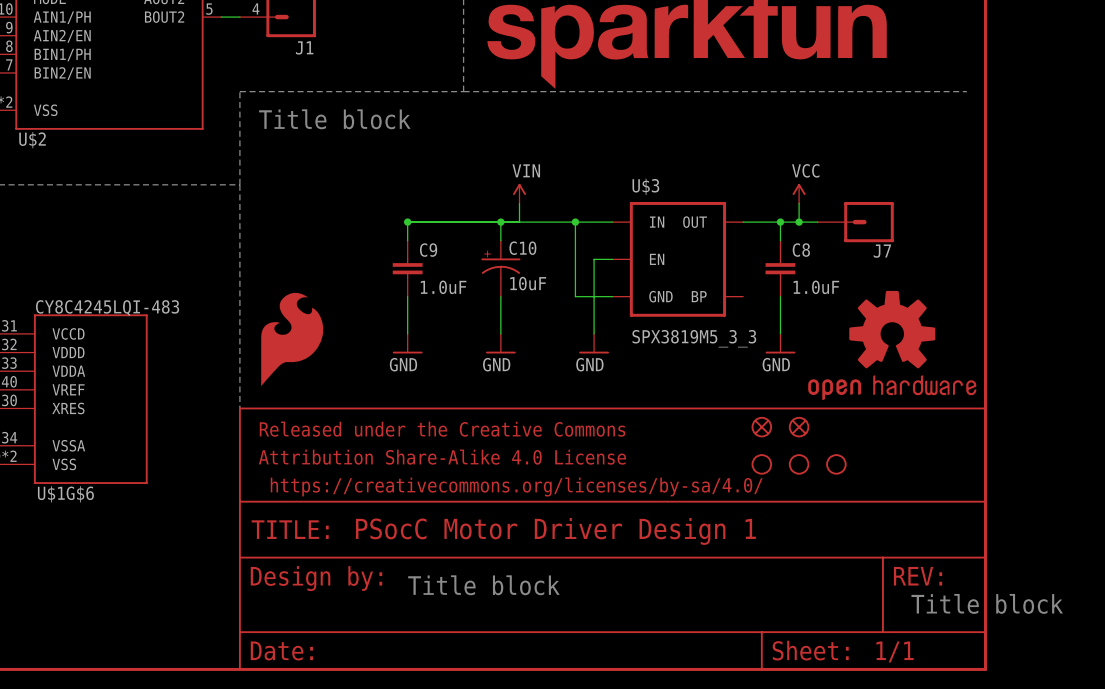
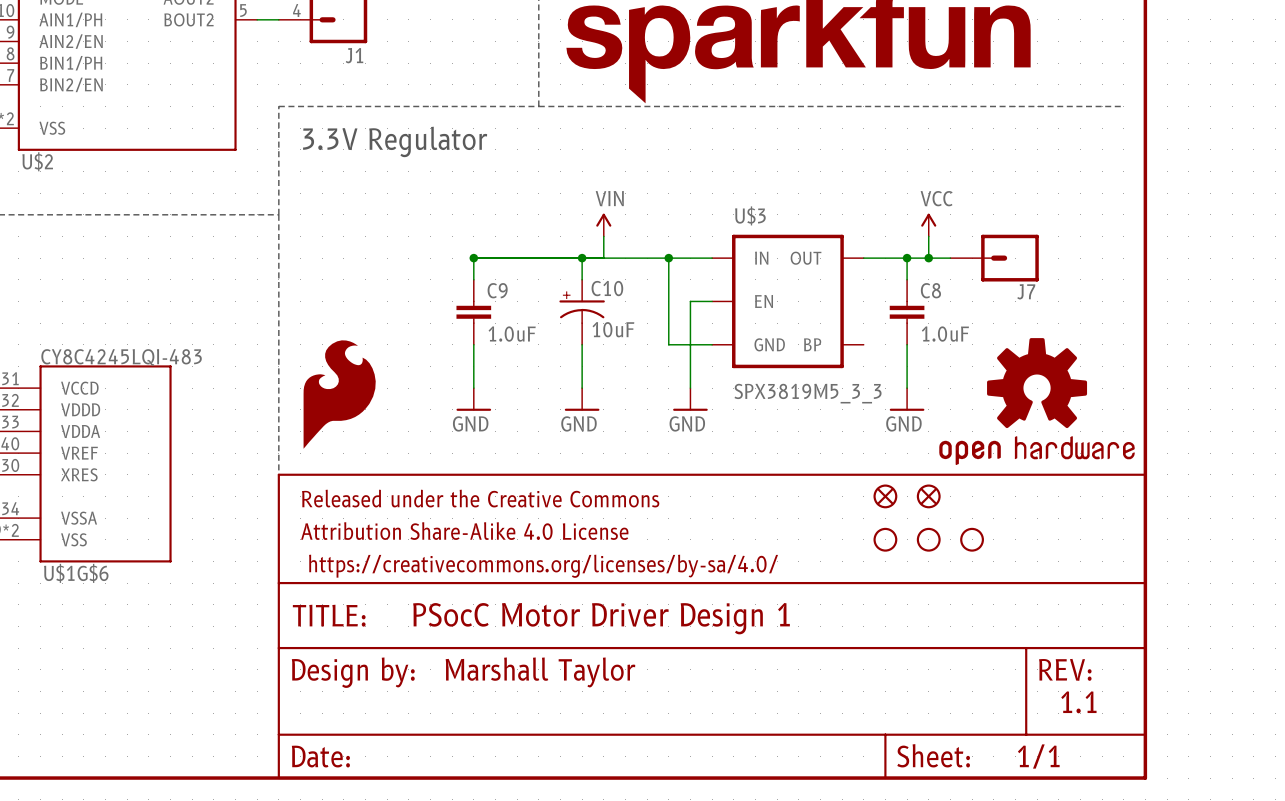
text: Title block (334, 119) -> 3.3V Regulator (395, 141)
text: none -> Marshall Taylor (540, 672)
text: Title block (483, 585) -> none
text: Title block (987, 603) -> 1.1 (1078, 702)

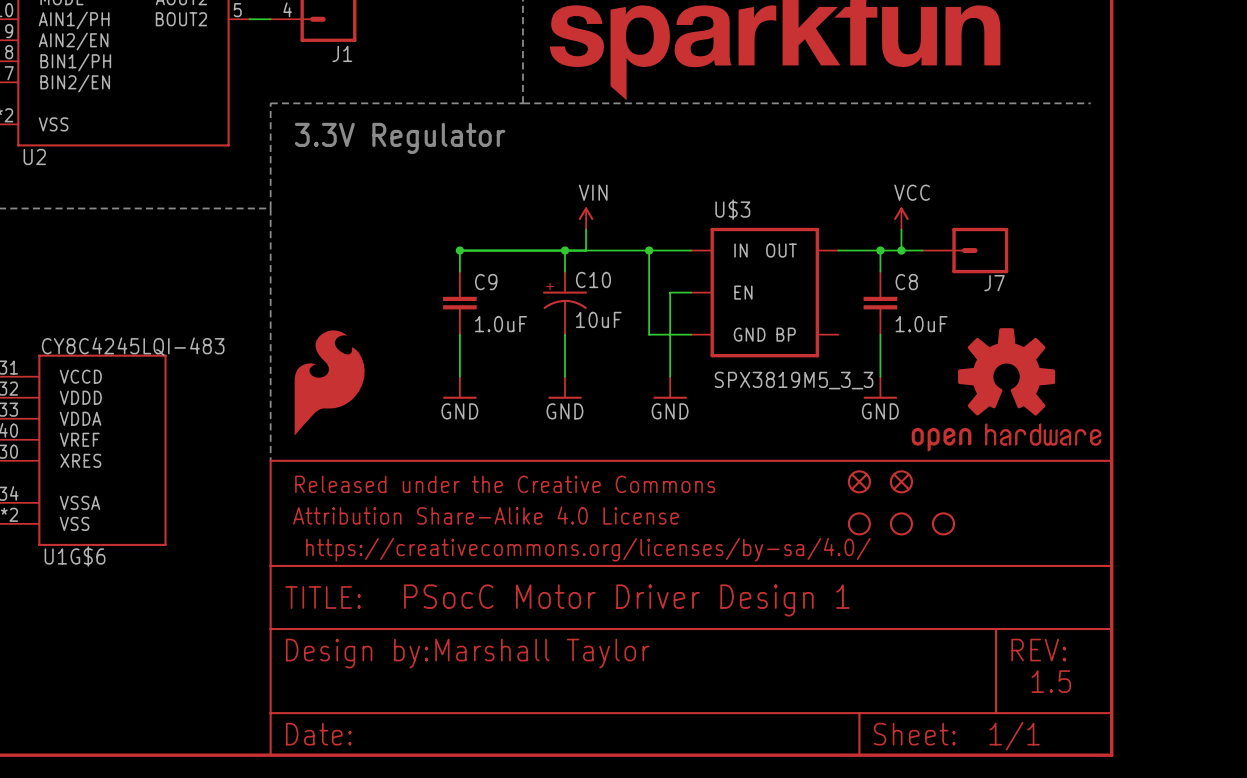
U$2 name: U$2 (37, 161) -> U2 (34, 156)
U$1G$6 name: U$1G$6 (76, 573) -> U1G$6 (75, 556)
text: 1.1 (1078, 702) -> 1.5 (1051, 681)

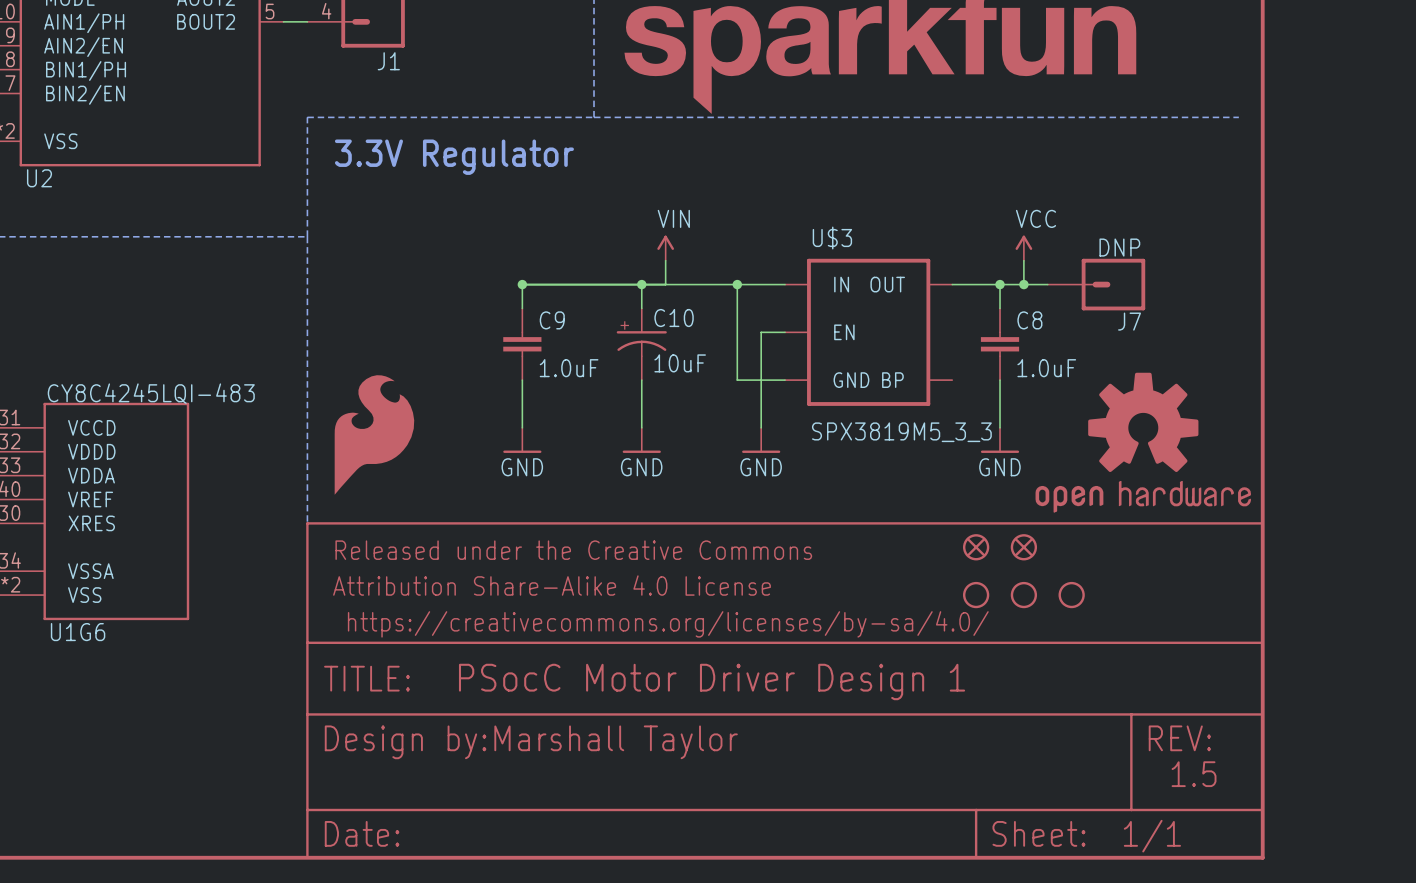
J7 value: none -> DNP (1119, 247)
U1G$6 name: U1G$6 (75, 556) -> U1G6 (78, 632)

